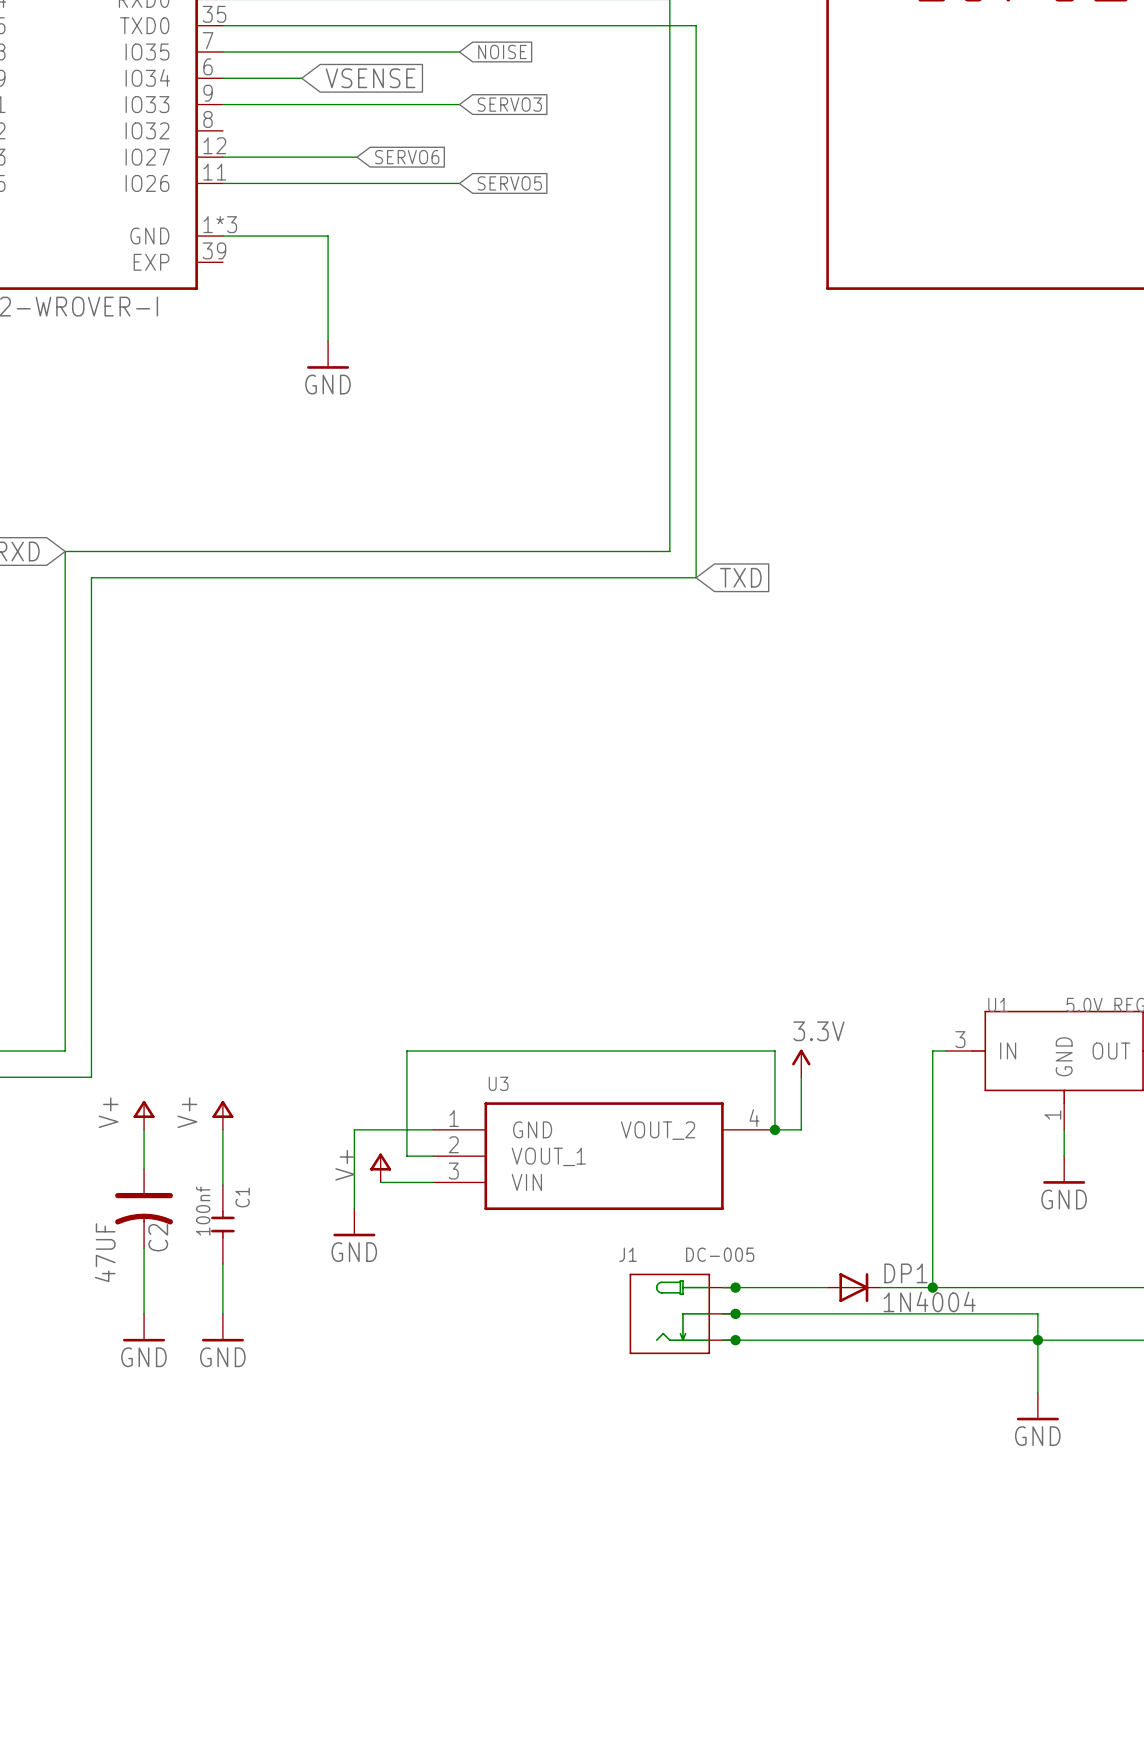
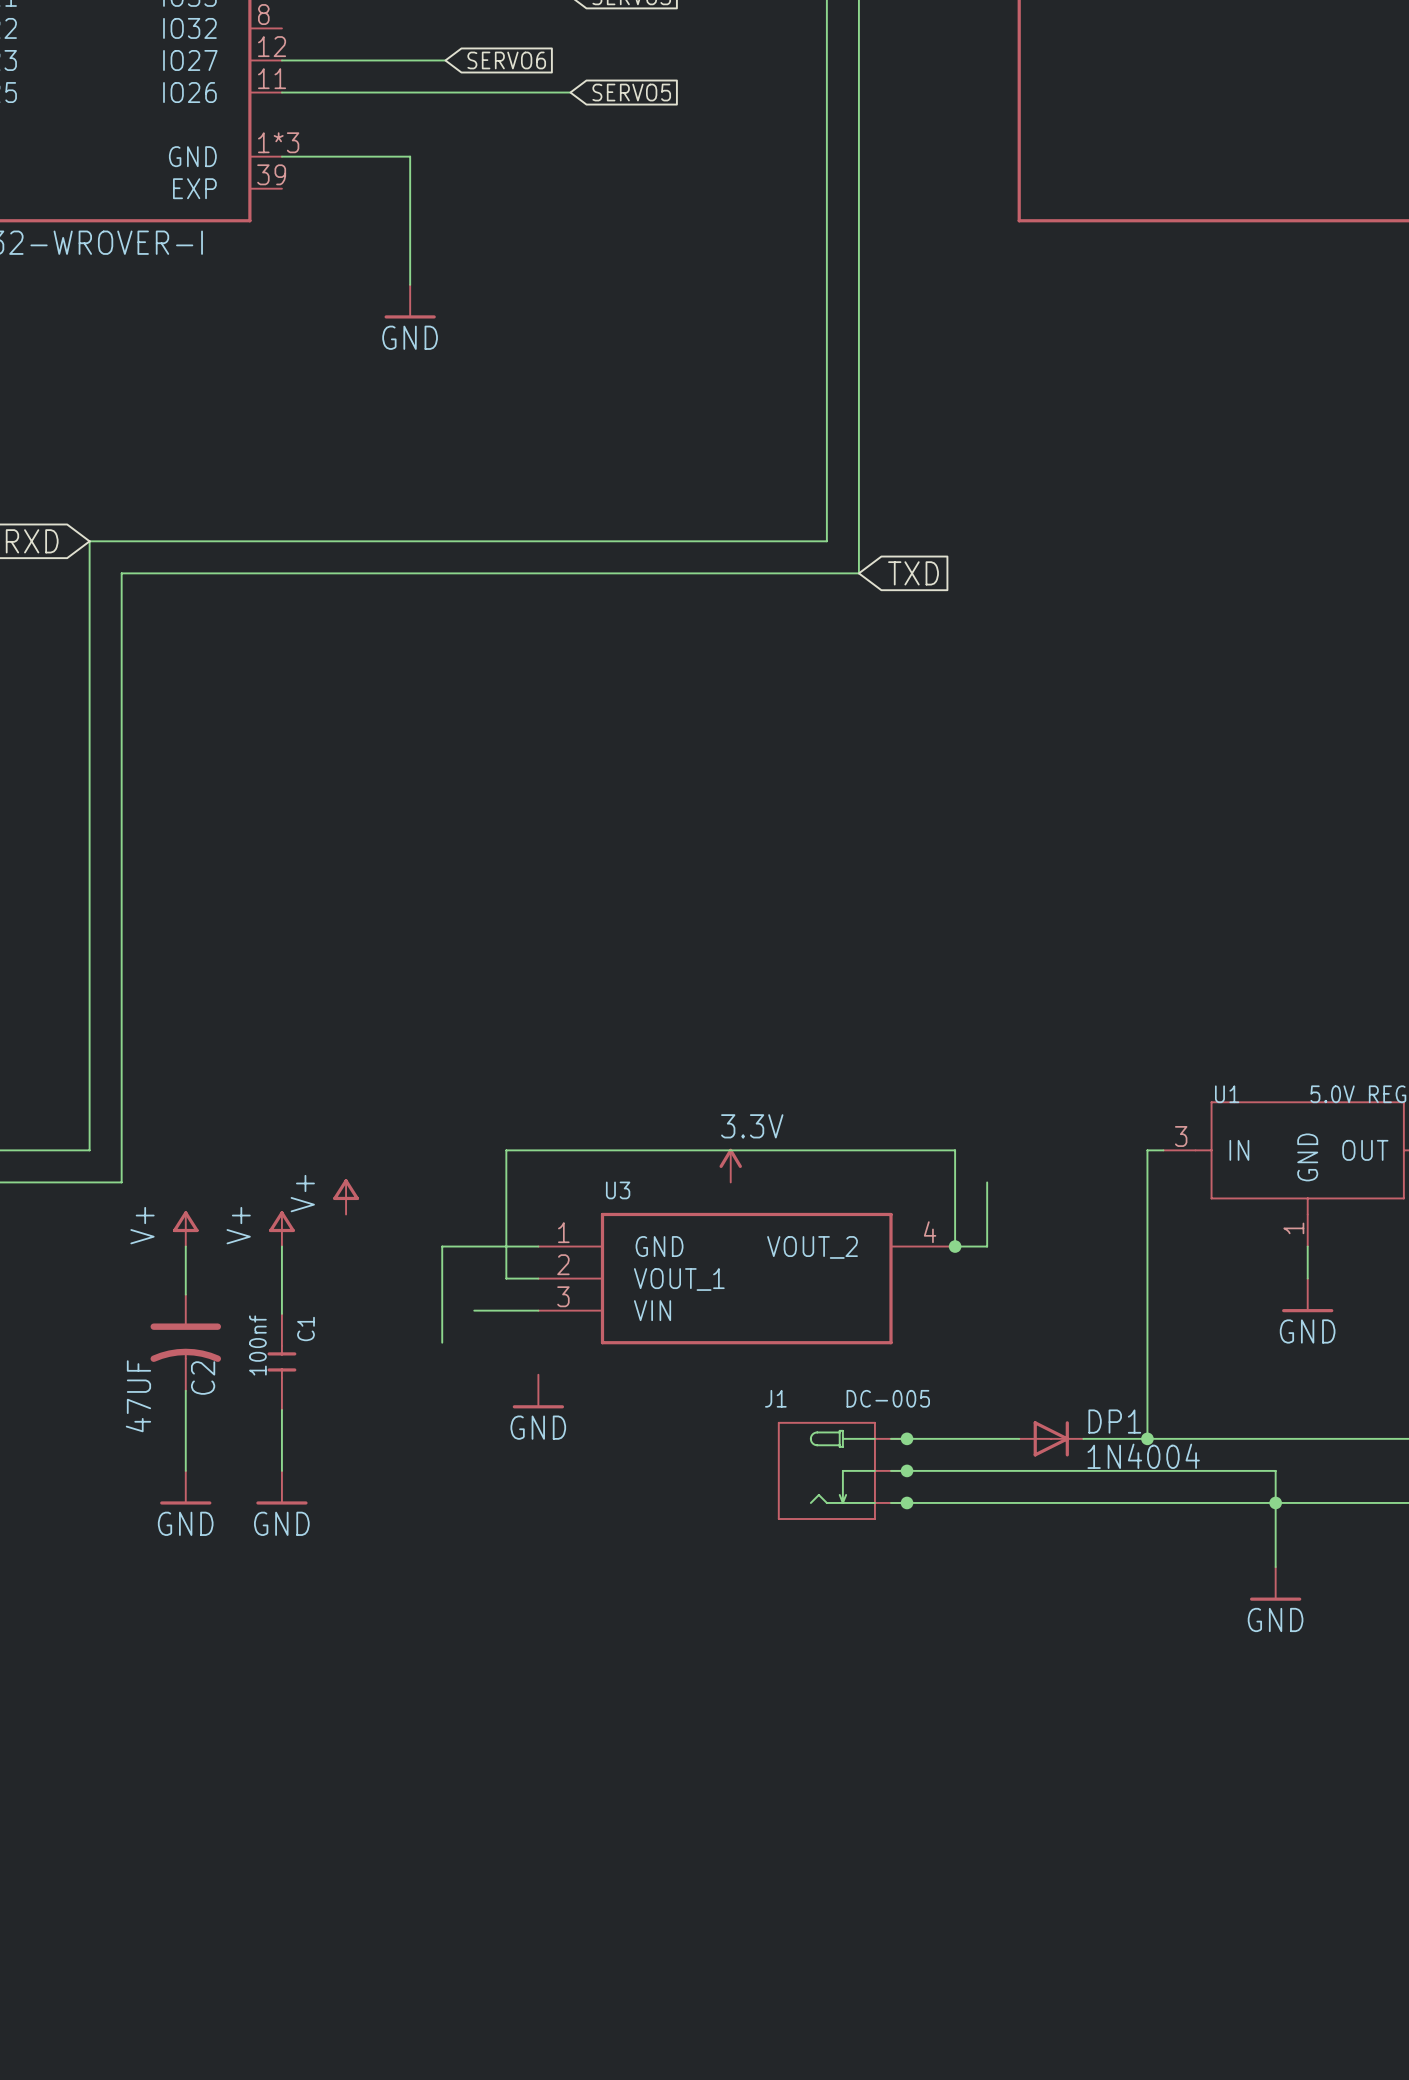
power symbol position: 3.3V (801, 1063) -> 3.3V (730, 1165)
power symbol position: V+ (380, 1167) -> V+ (346, 1196)
power symbol position: GND (354, 1222) -> GND (538, 1391)

